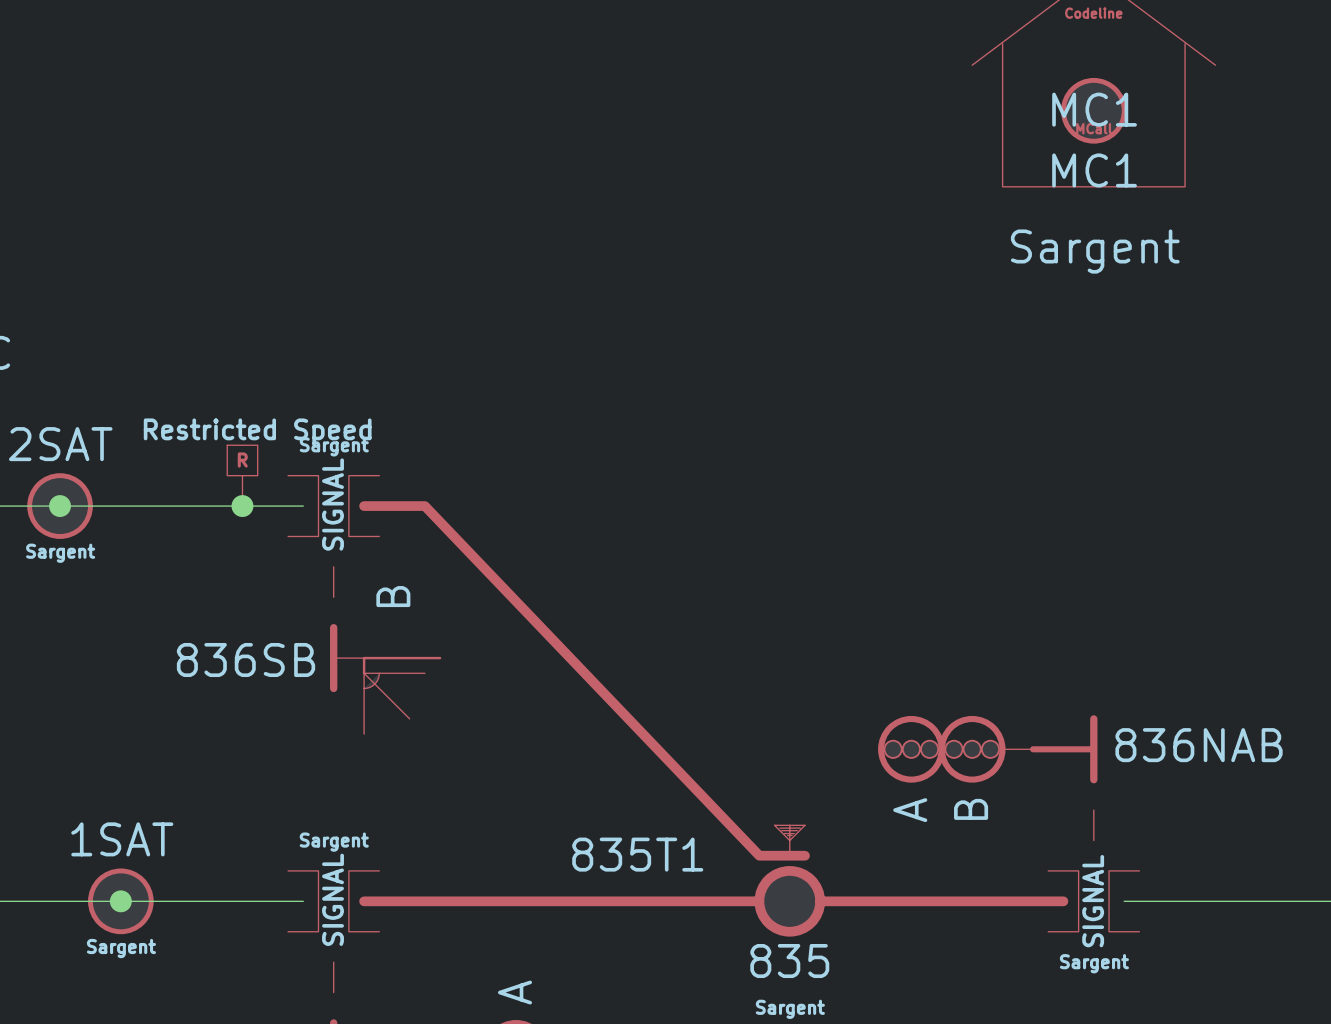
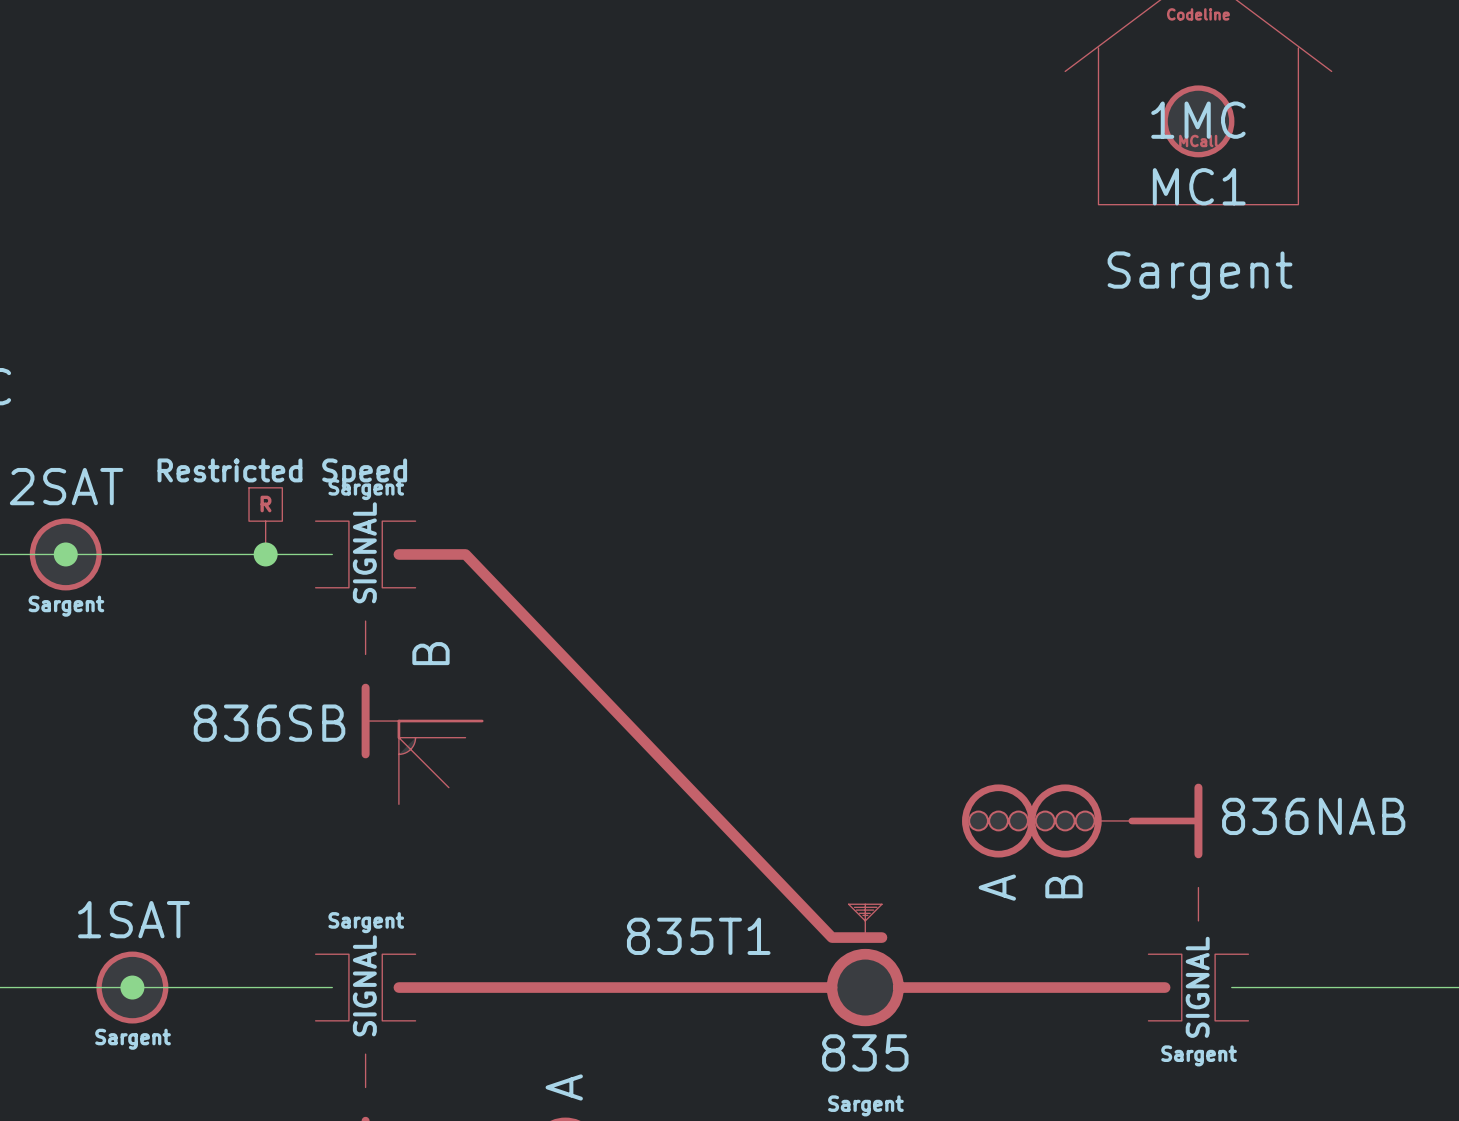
MC1 text: none -> 1MC (1198, 120)
MC1 value: MC1 (1094, 109) -> none

